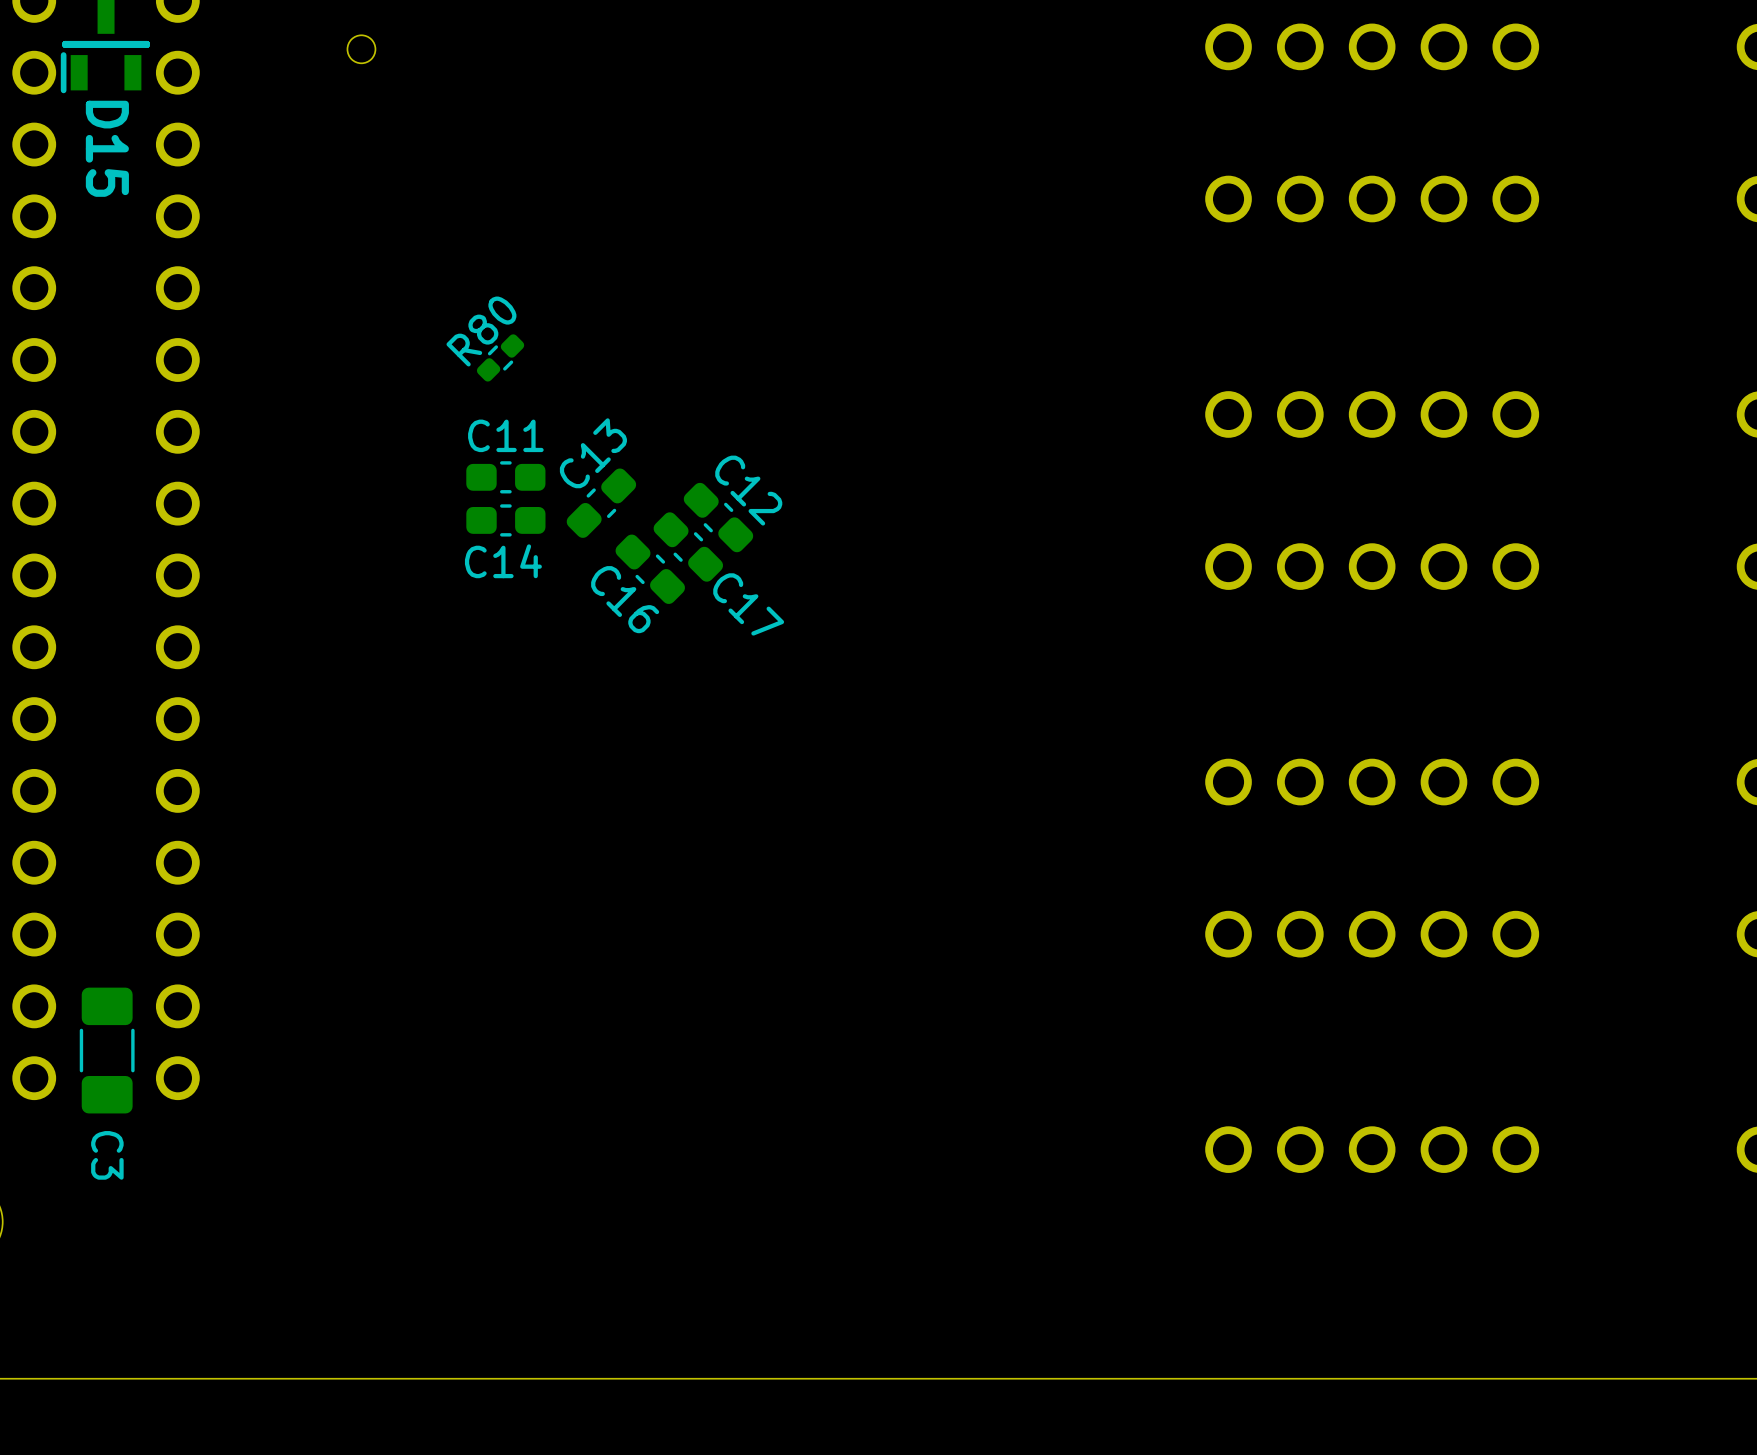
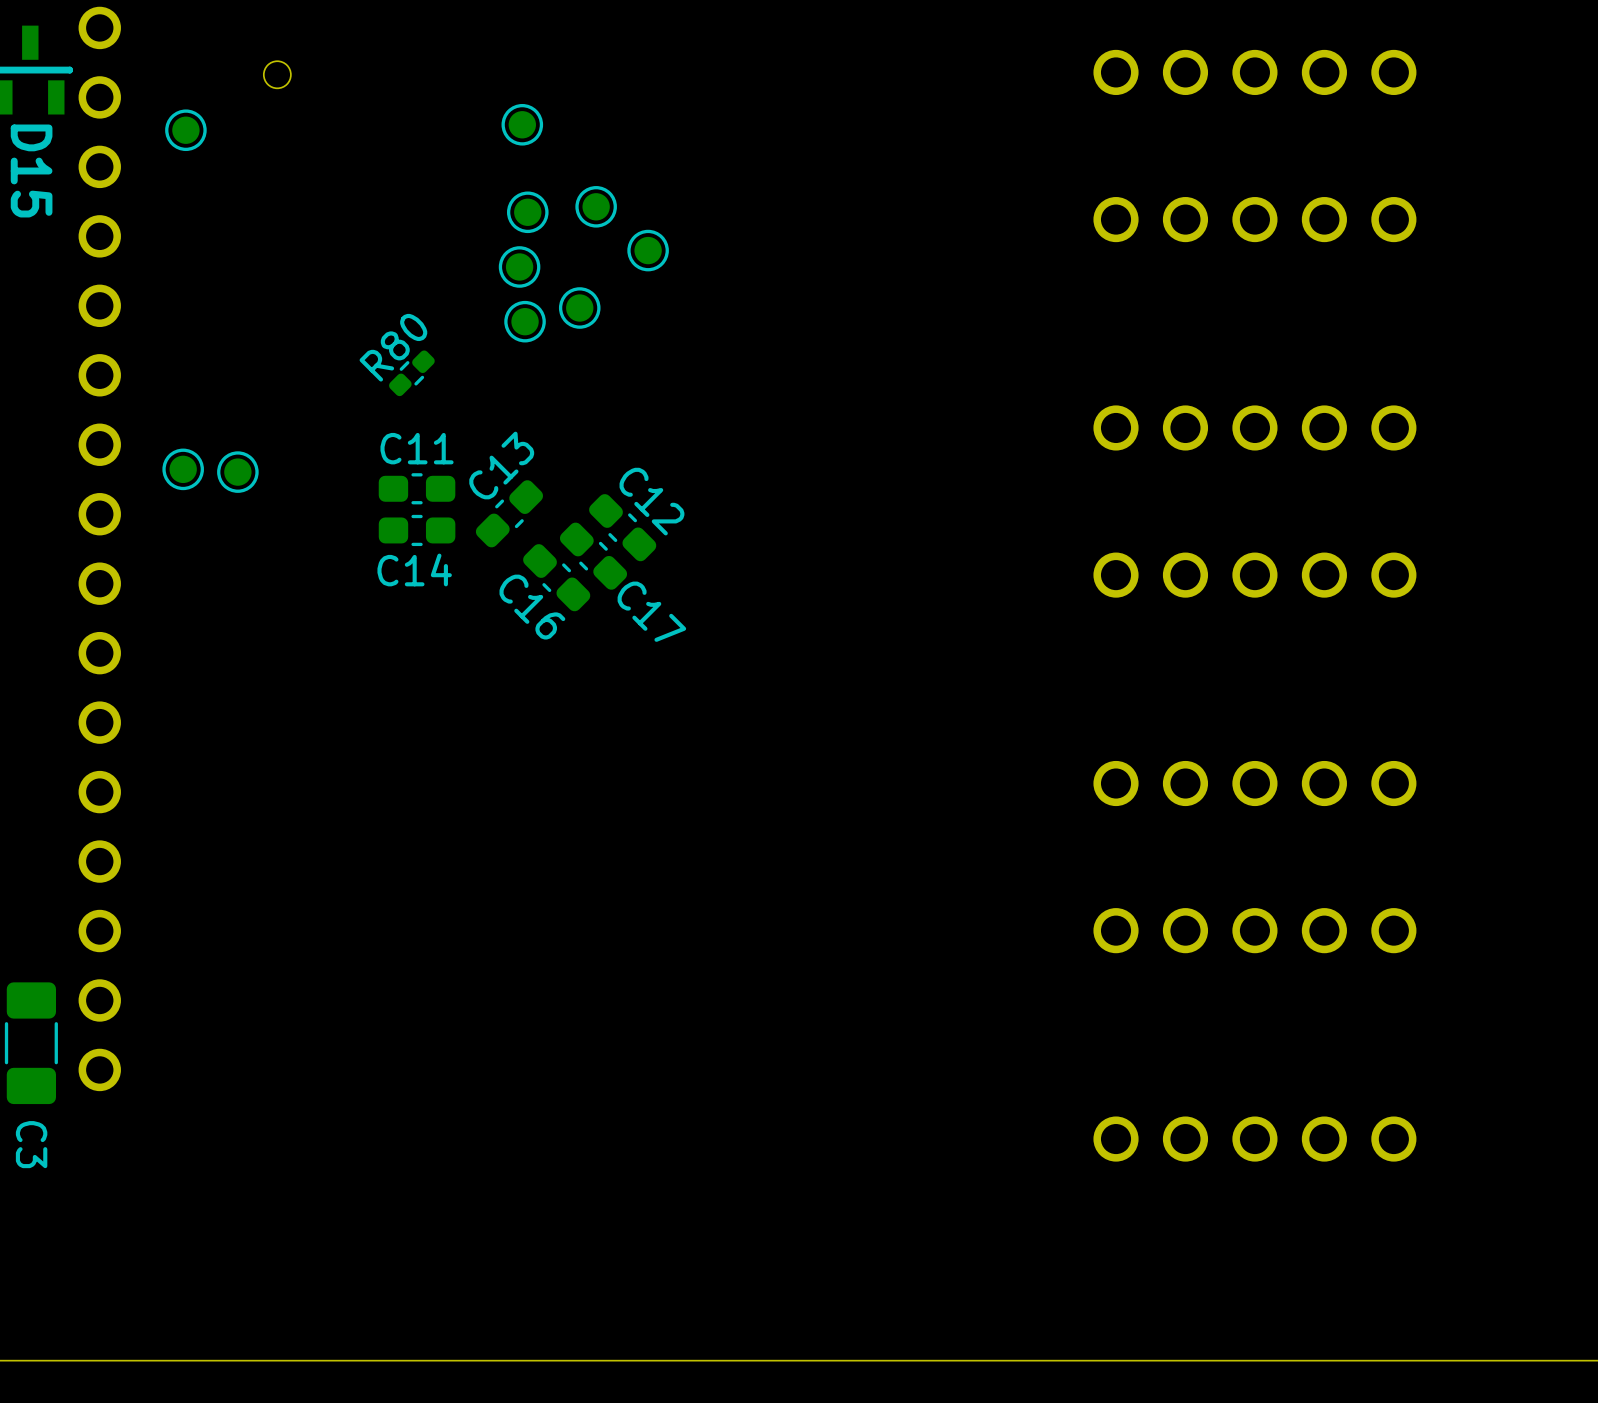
part: none -> (522, 124)
part: none -> (185, 130)
part: none -> (596, 206)
part: none -> (527, 212)
part: none -> (648, 250)
part: none -> (519, 266)
part: none -> (579, 308)
part: none -> (525, 321)
part: none -> (183, 469)
part: none -> (237, 472)

